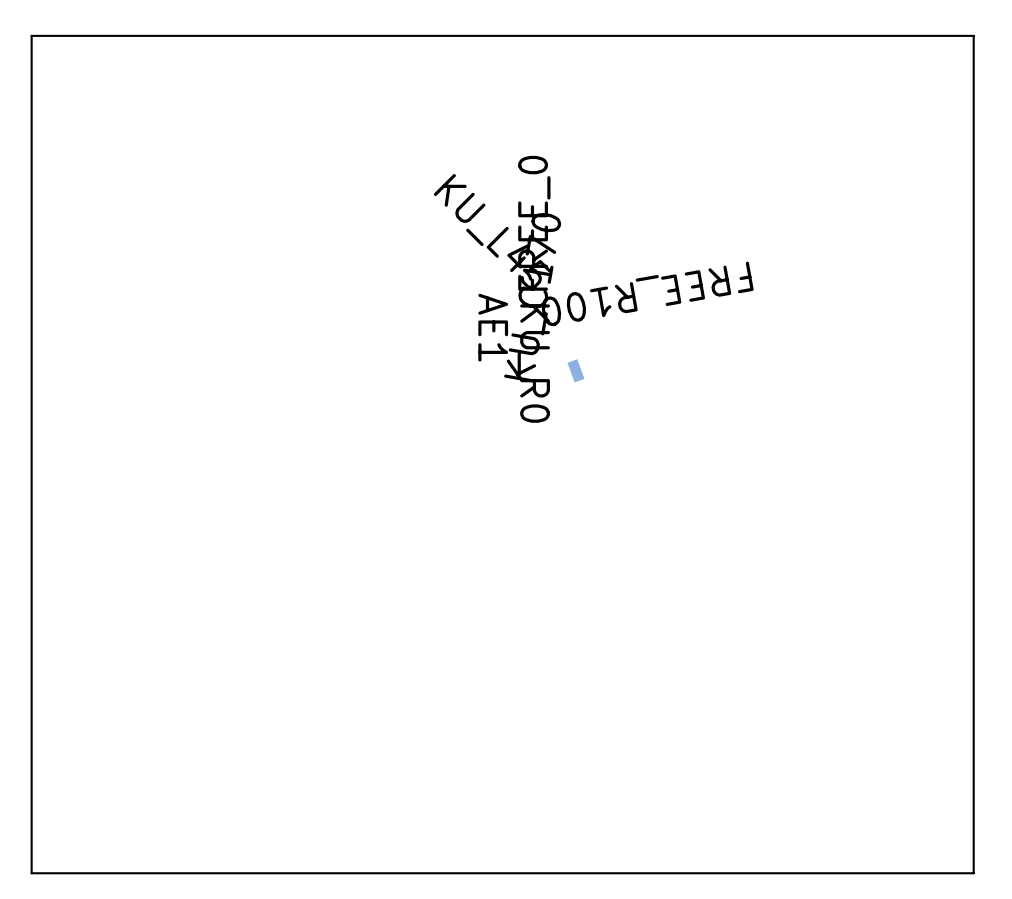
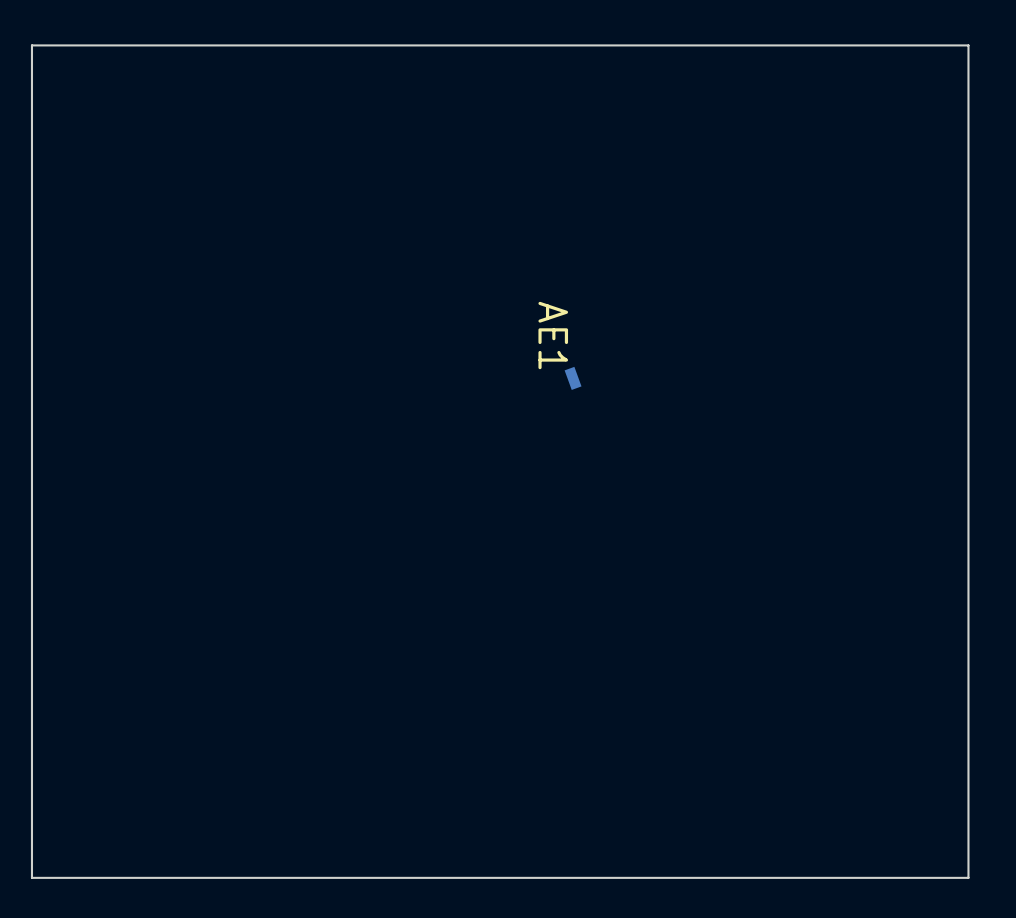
AE1 name position: AE1 (493, 327) -> AE1 (553, 335)
AE1 footprint: [567, 359, 585, 383] -> [564, 366, 582, 390]

